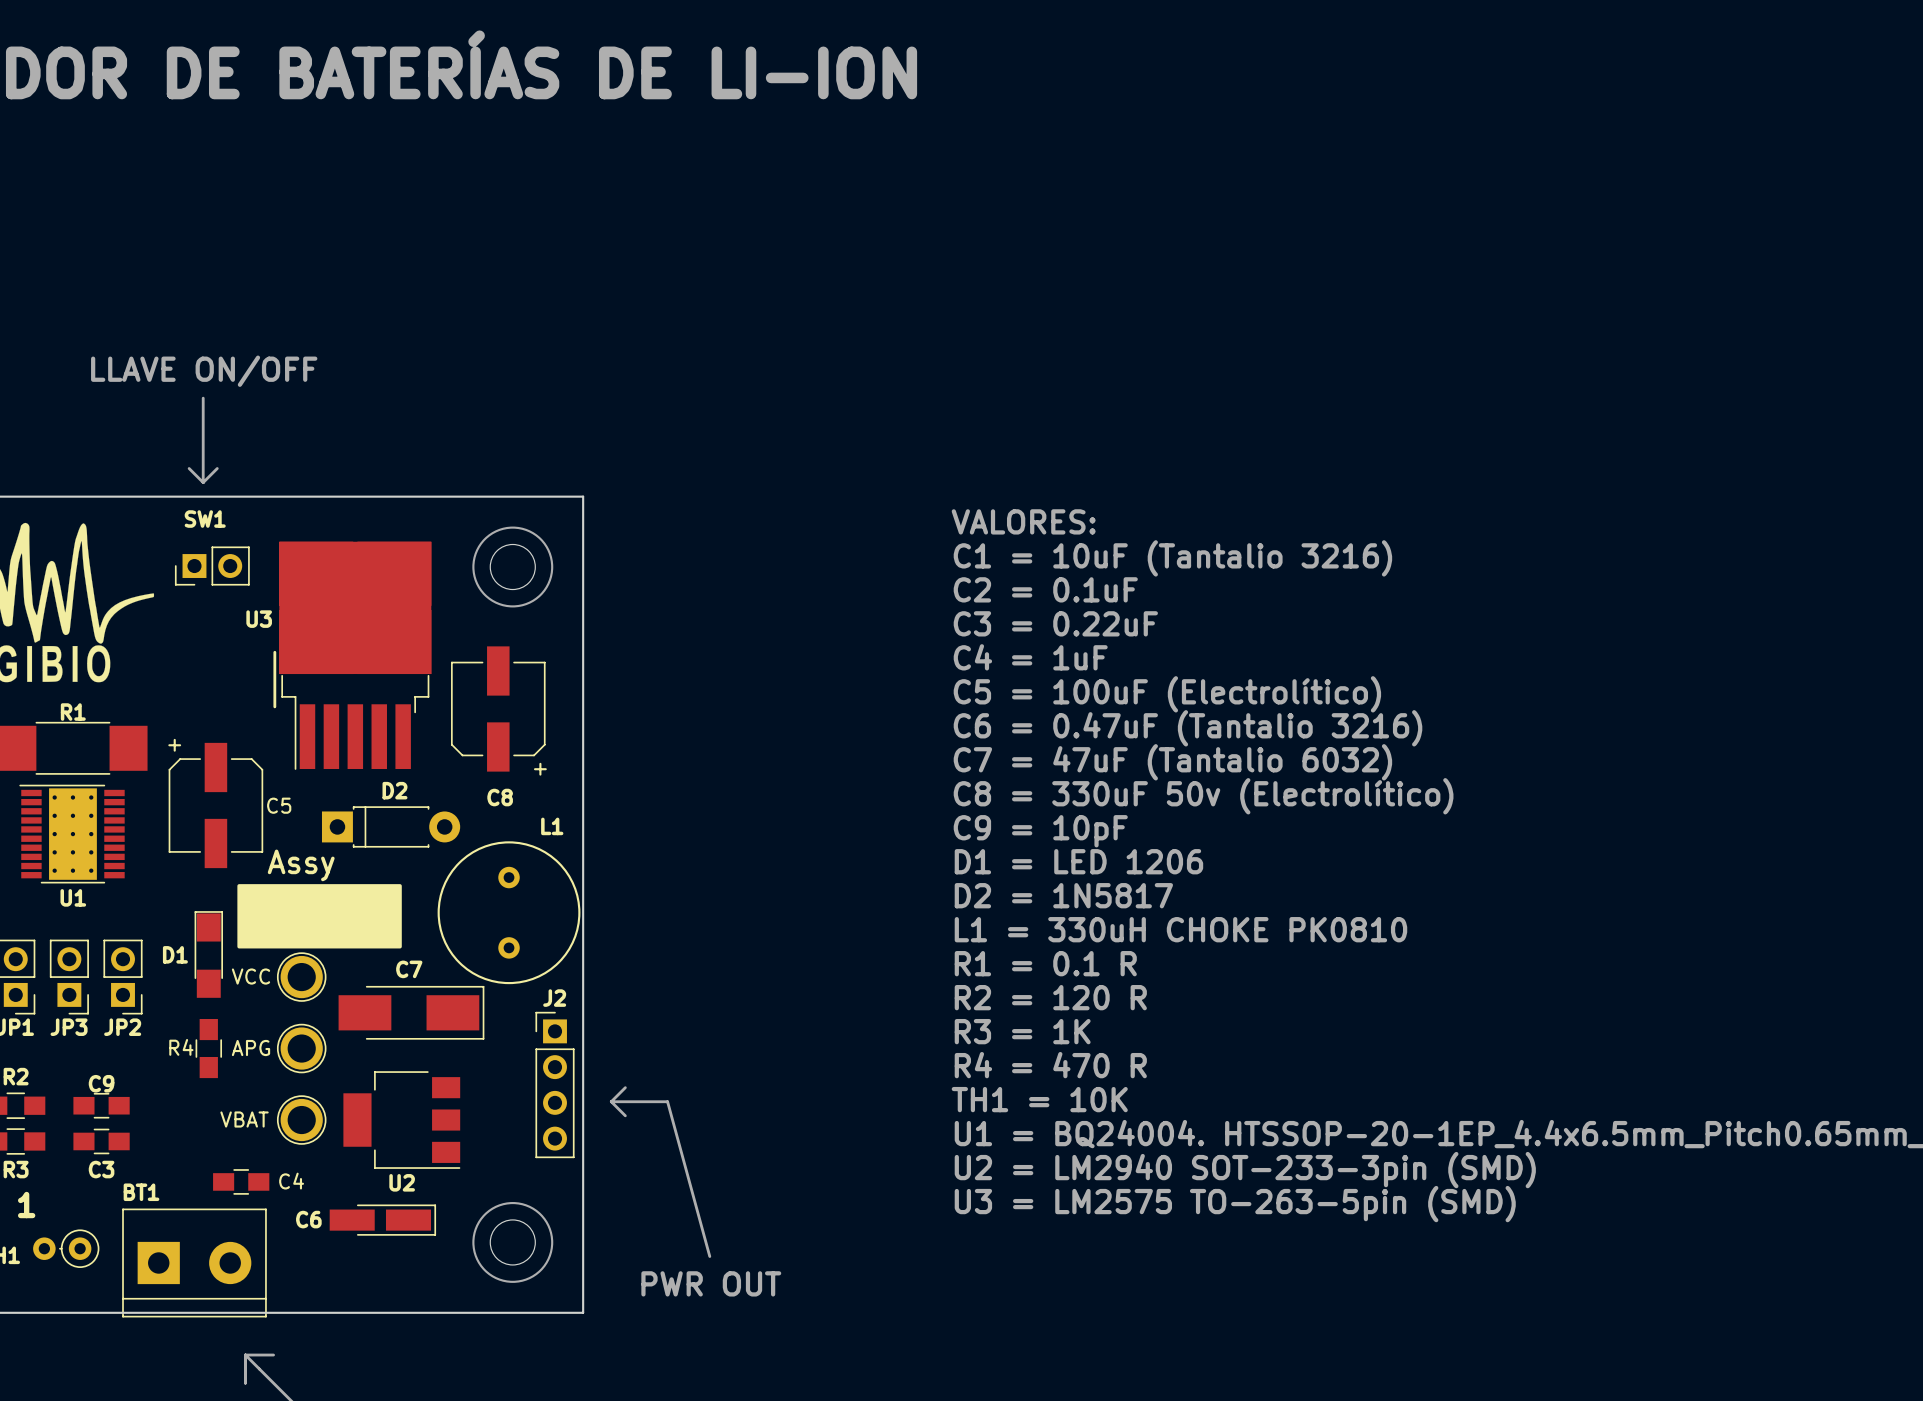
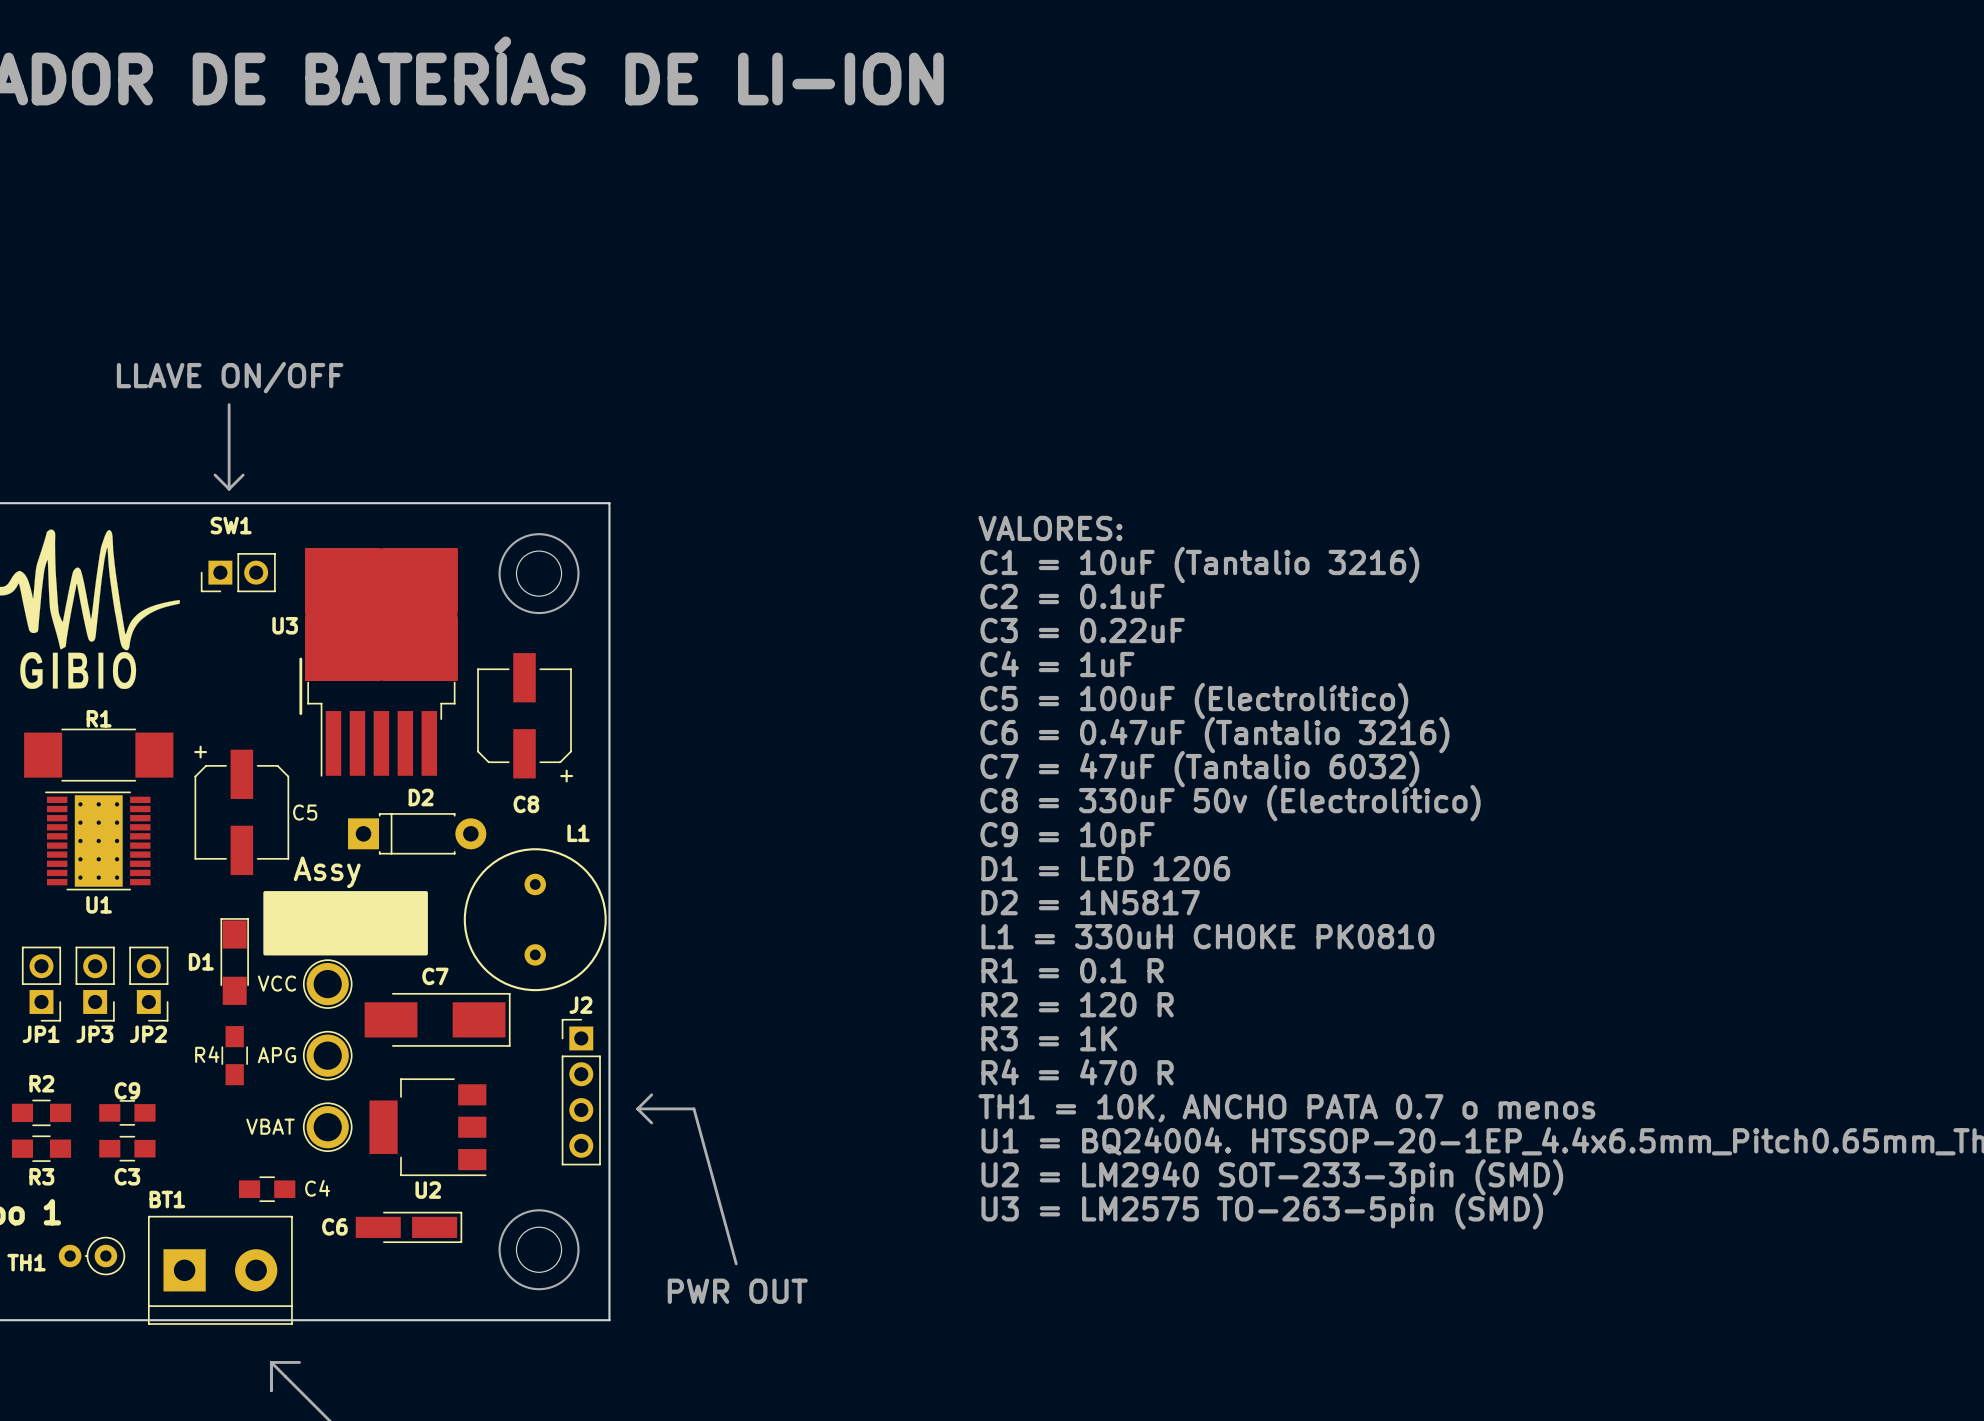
text: TH1 = 10K (1039, 1099) -> TH1 = 10K, ANCHO PATA 0.7 o menos (1286, 1108)

